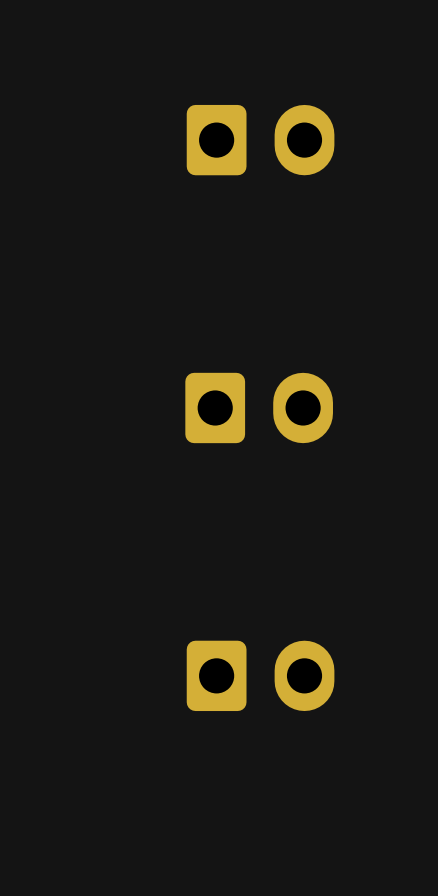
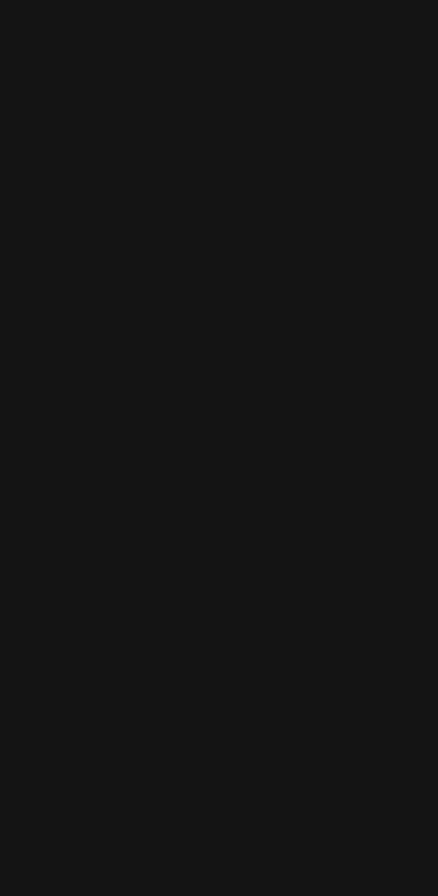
part: (260, 140) -> none
part: (259, 407) -> none
part: (260, 675) -> none

